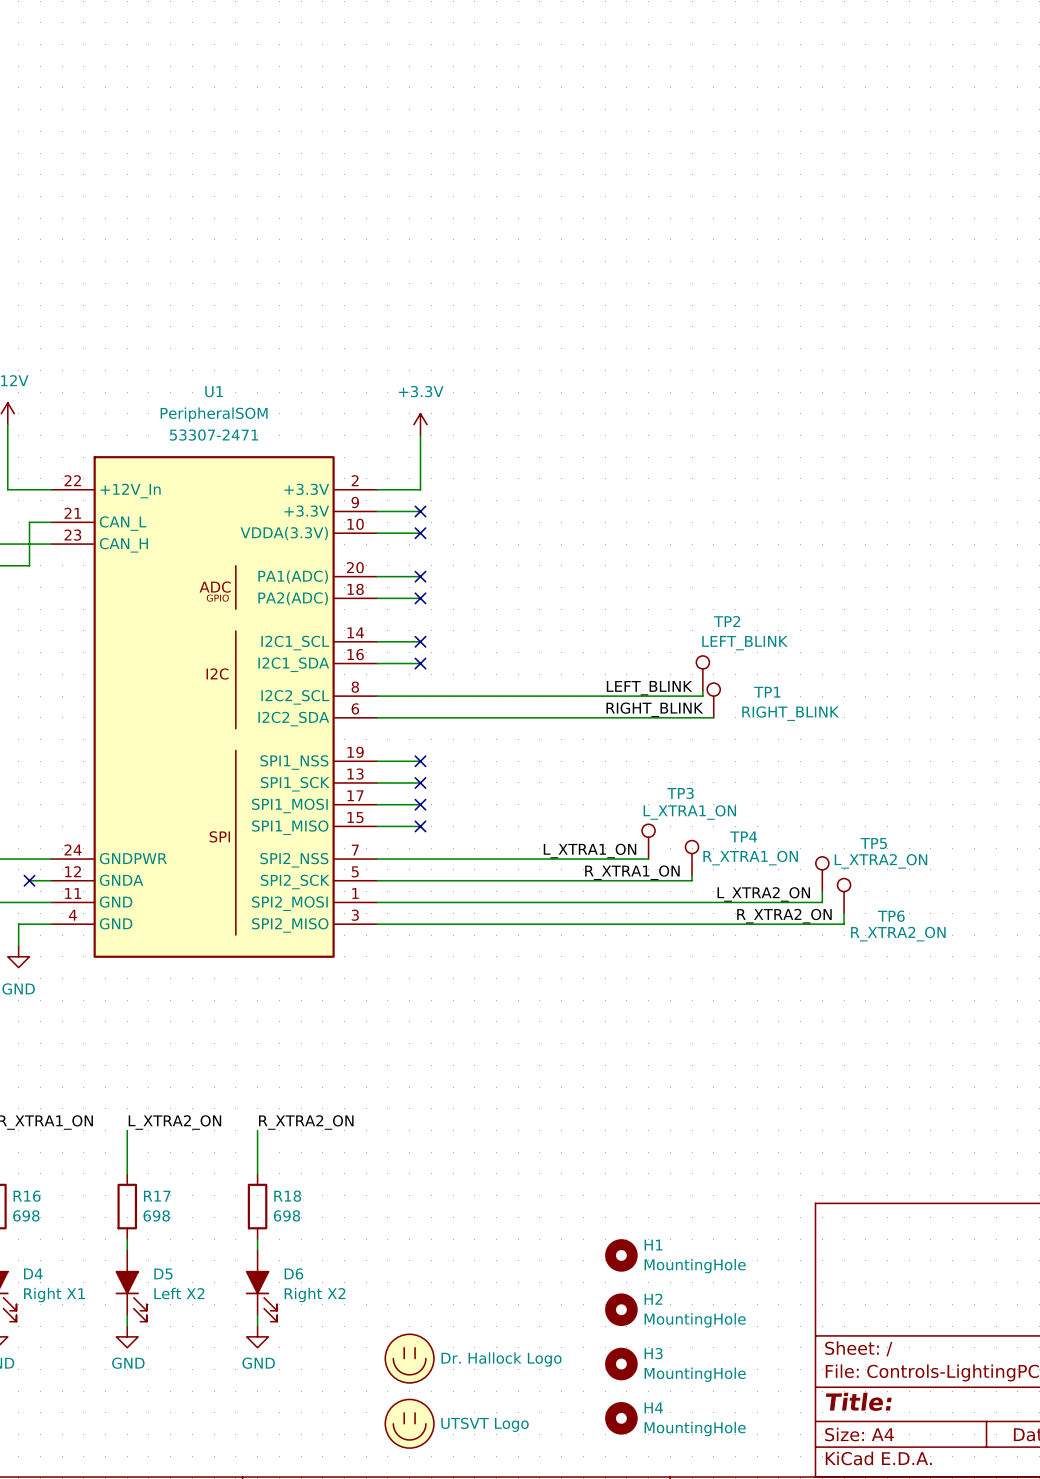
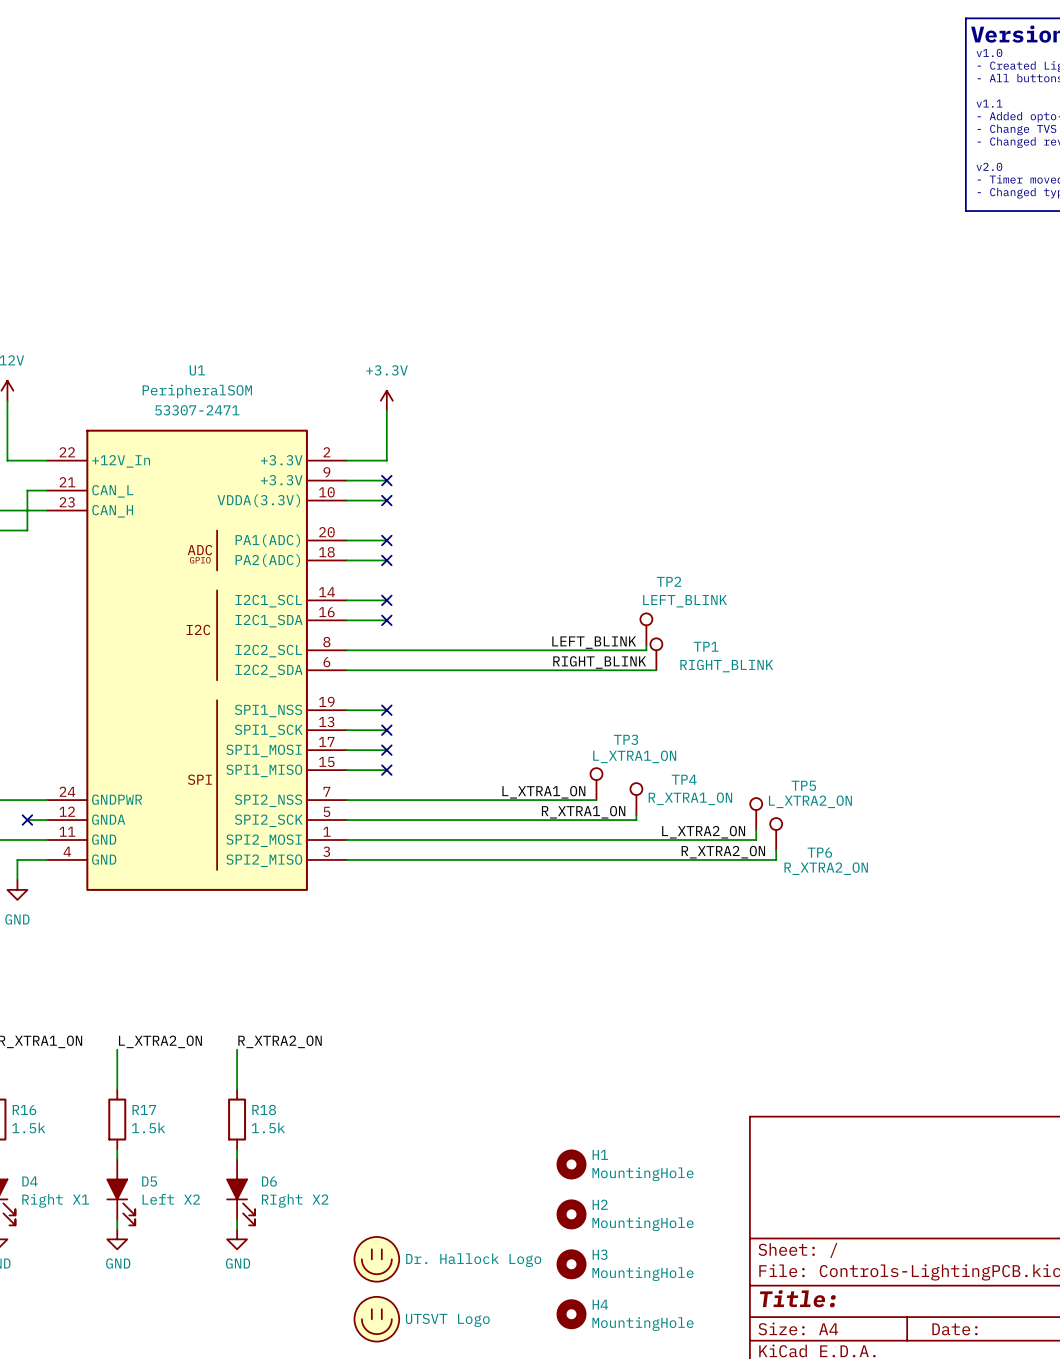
R16 value: 698 (26, 1215) -> 1.5k (28, 1127)
R17 value: 698 (156, 1215) -> 1.5k (148, 1127)
R18 value: 698 (287, 1215) -> 1.5k (268, 1127)
D6 value: Right X2 (315, 1295) -> RIght X2 (295, 1200)

